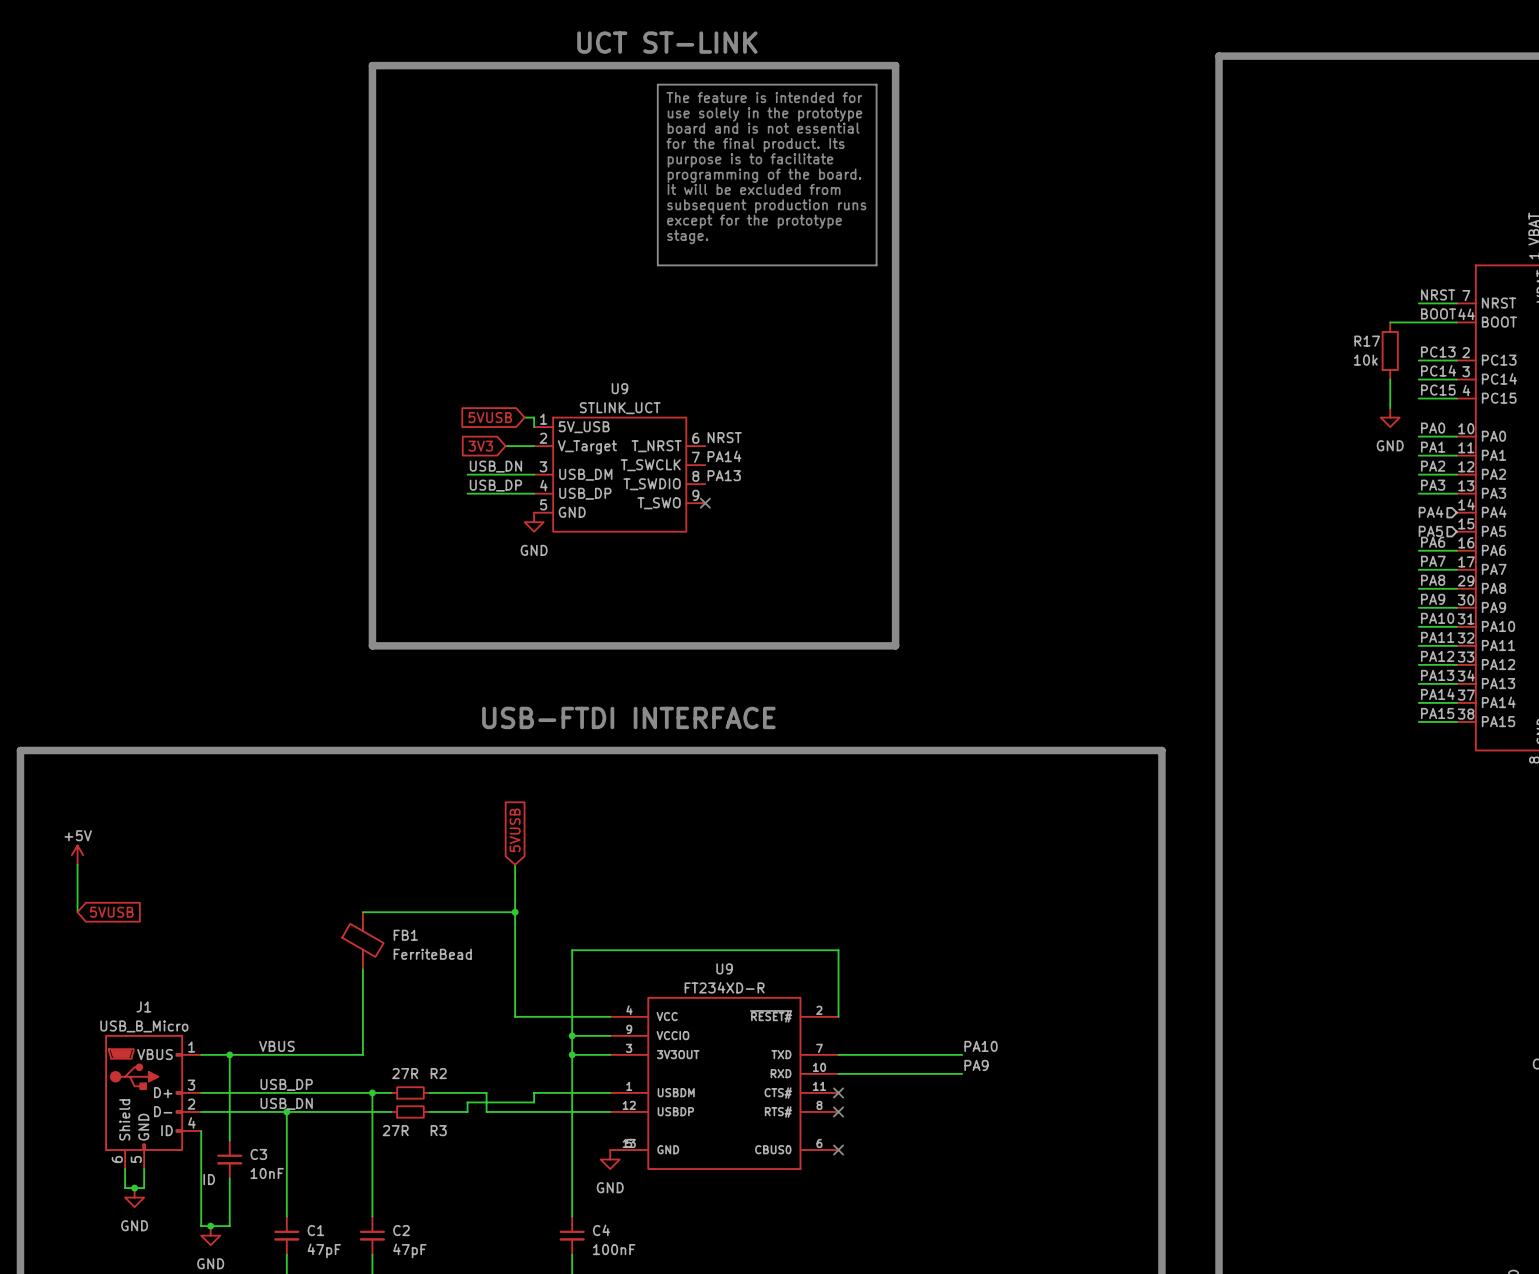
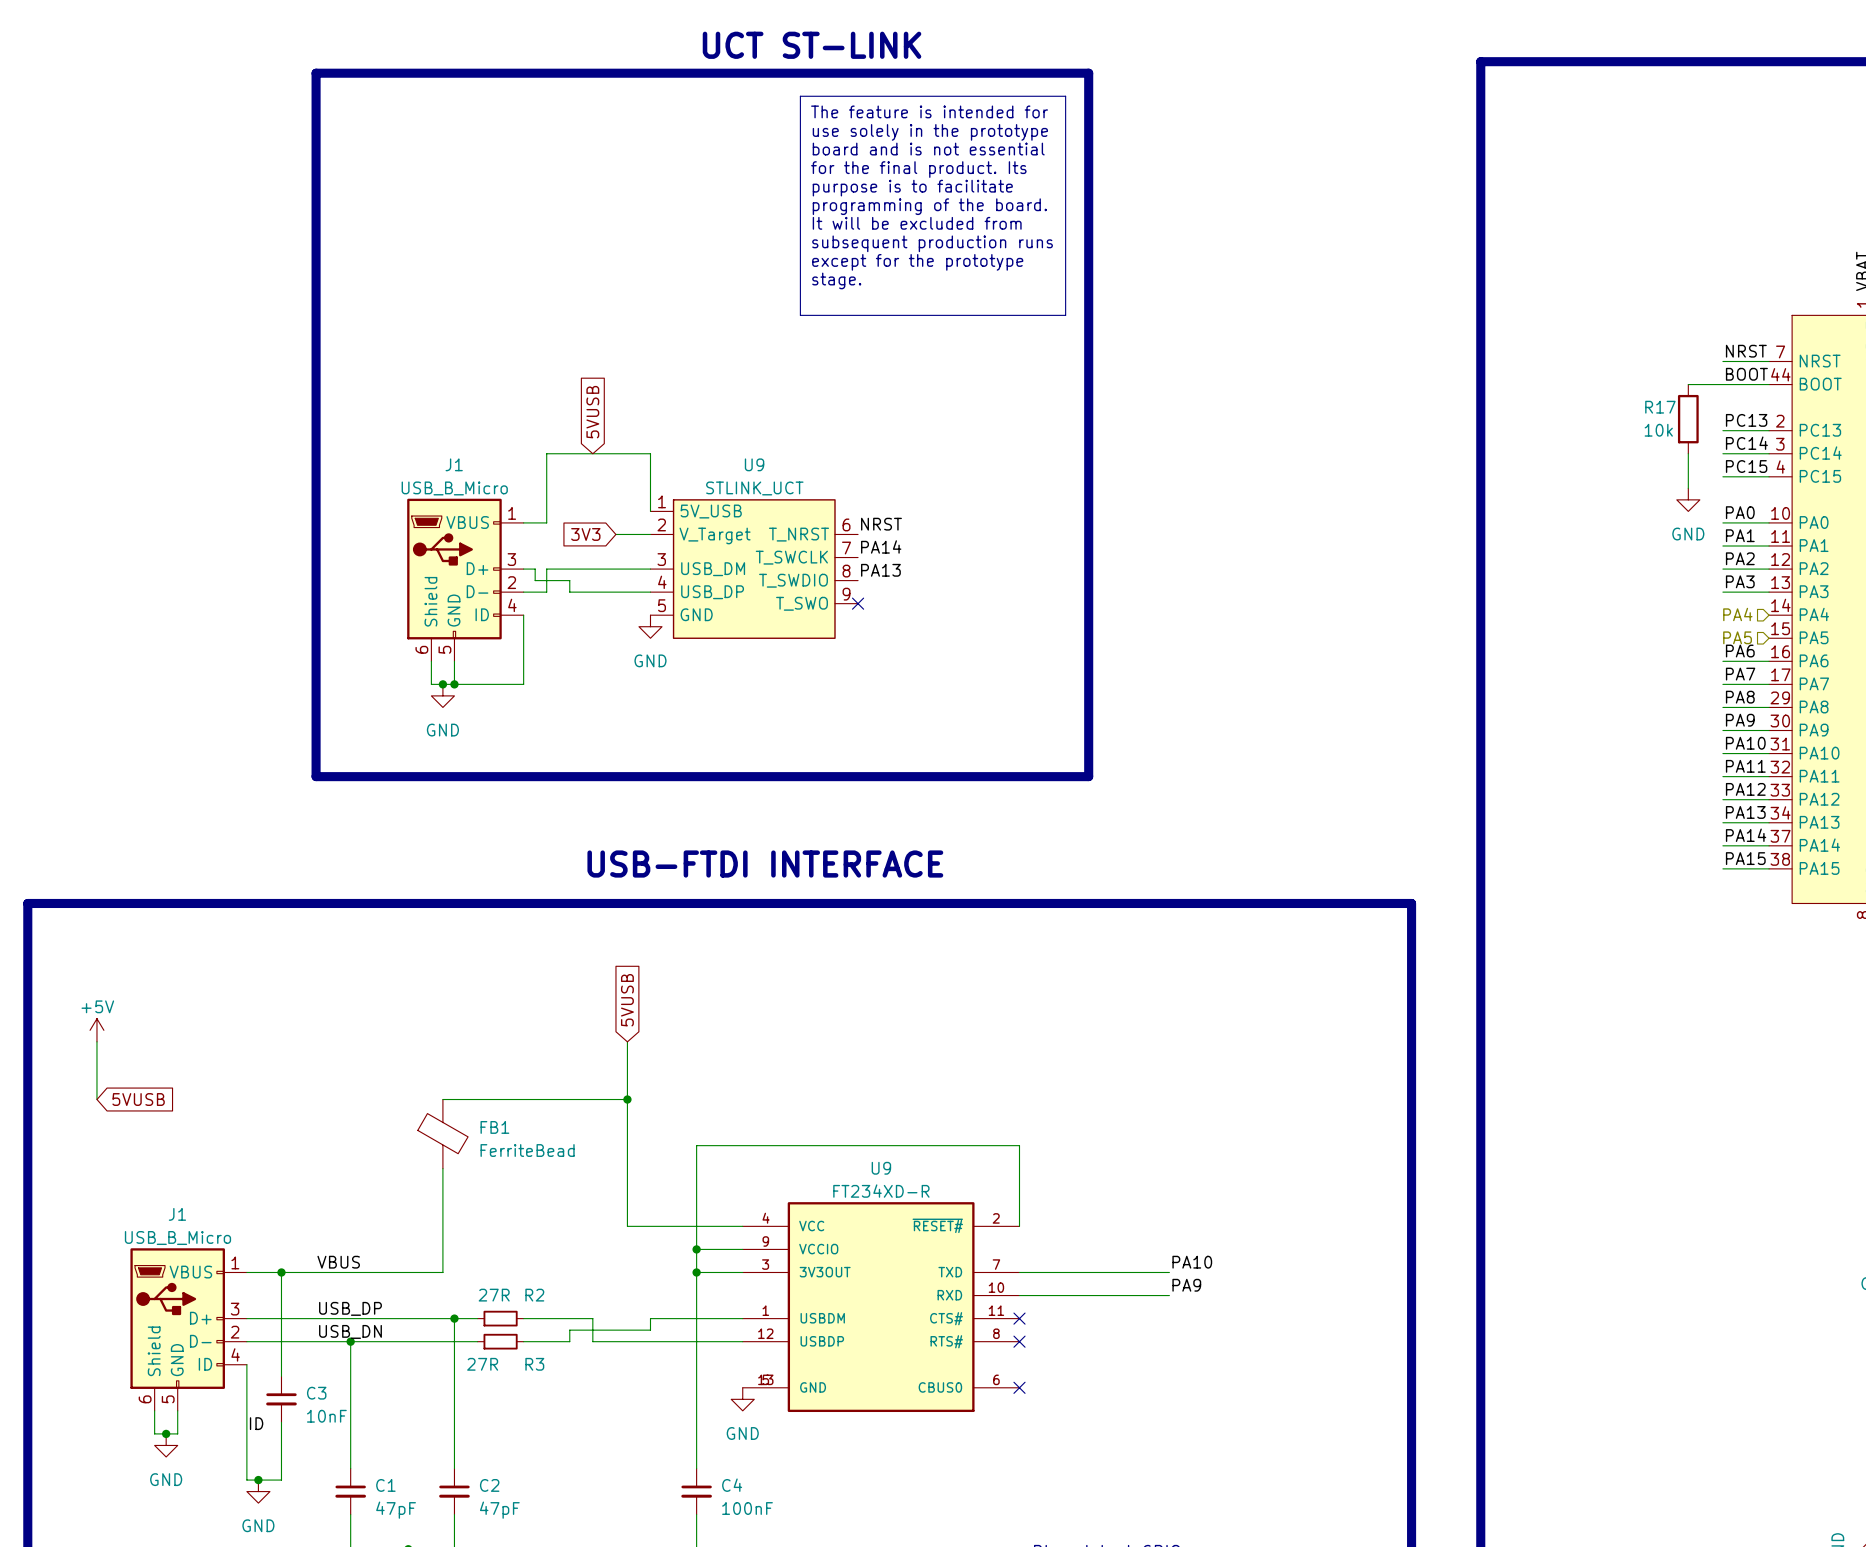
line: (372, 65) (372, 645) -> (454, 73) (316, 73) (316, 776) (454, 776)
global label rotation: 0° (490, 417) -> 90° clockwise (592, 412)
global label position: 5VUSB (490, 417) -> 5VUSB (592, 412)
wire: (524, 417) (534, 417) -> (523, 522) (546, 522) (546, 453) (650, 453) (650, 499)
label: USB_DN (495, 466) -> none
wire: none -> (523, 569) (535, 569) (535, 580) (569, 580) (569, 592)
wire: none -> (569, 569) (546, 569) (546, 592) (523, 592)
J1: none -> USB_B_Micro (465, 580)
label: USB_DP (495, 485) -> none
wire: none -> (523, 615) (523, 684) (431, 684) (431, 661)
junction: none -> (442, 684)
junction: none -> (454, 684)
power symbol: none -> GND (442, 695)

